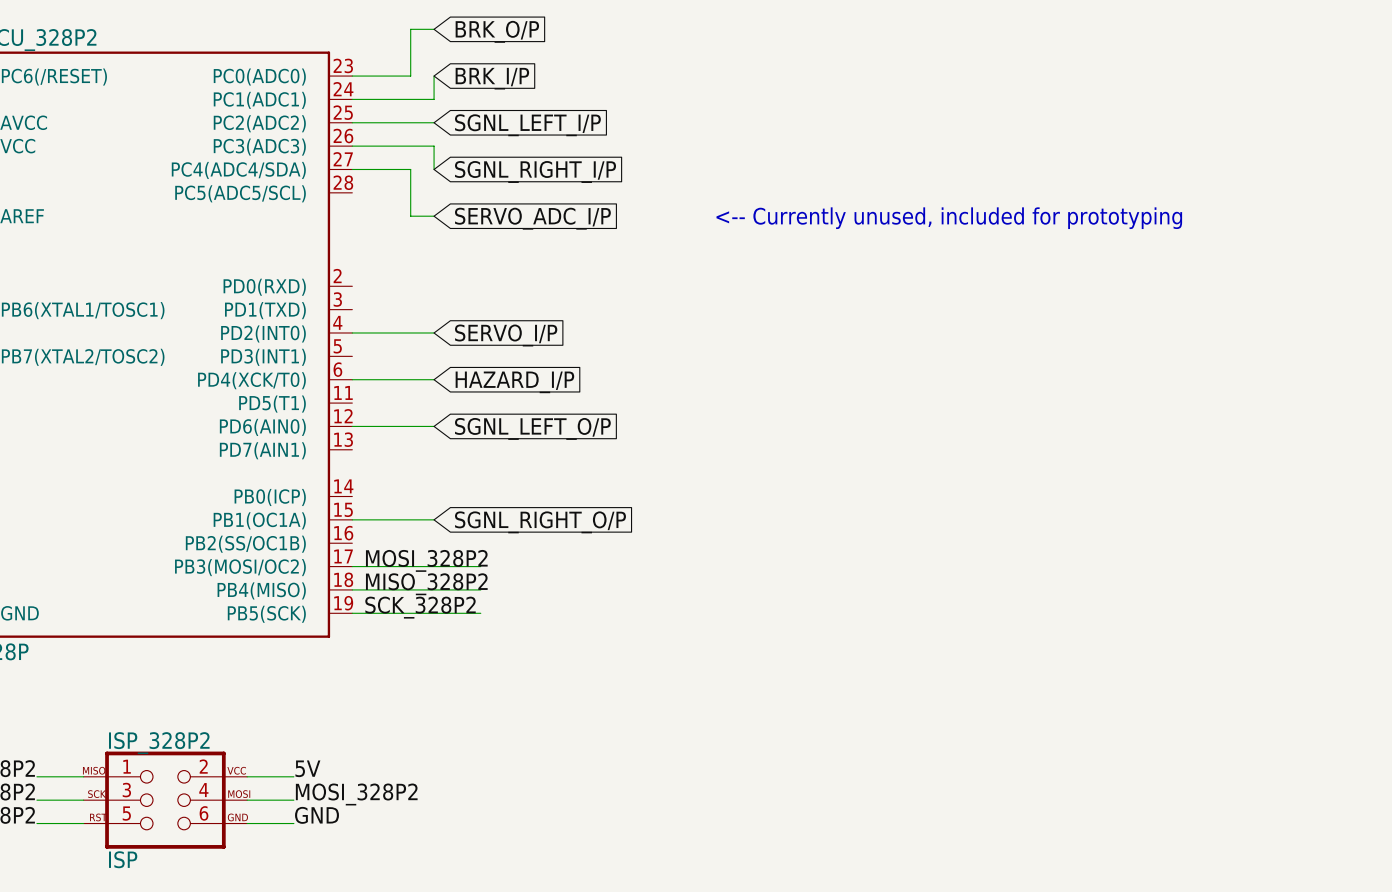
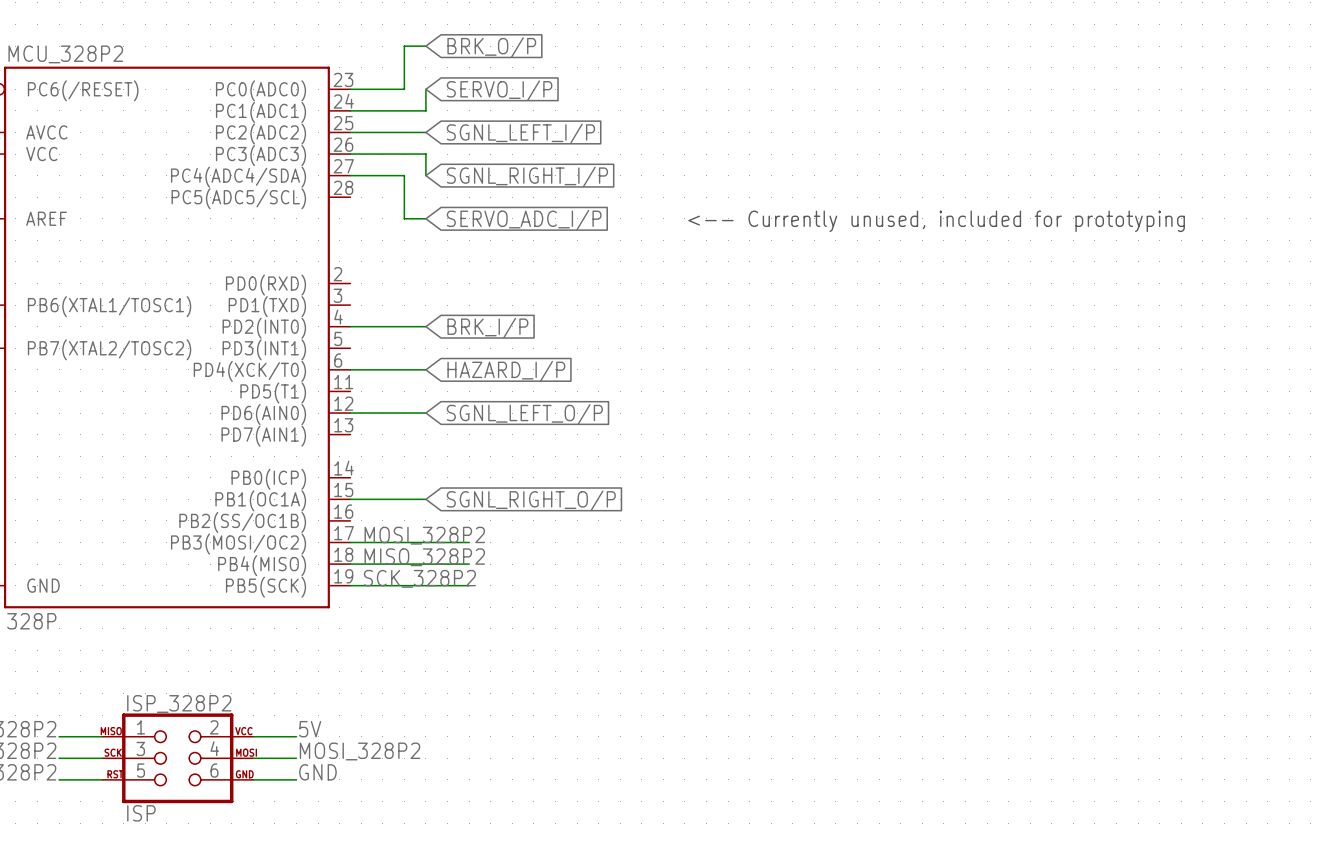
global label: BRK_I/P (492, 78) -> SERVO_I/P (499, 90)
global label: SERVO_I/P (506, 335) -> BRK_I/P (487, 328)

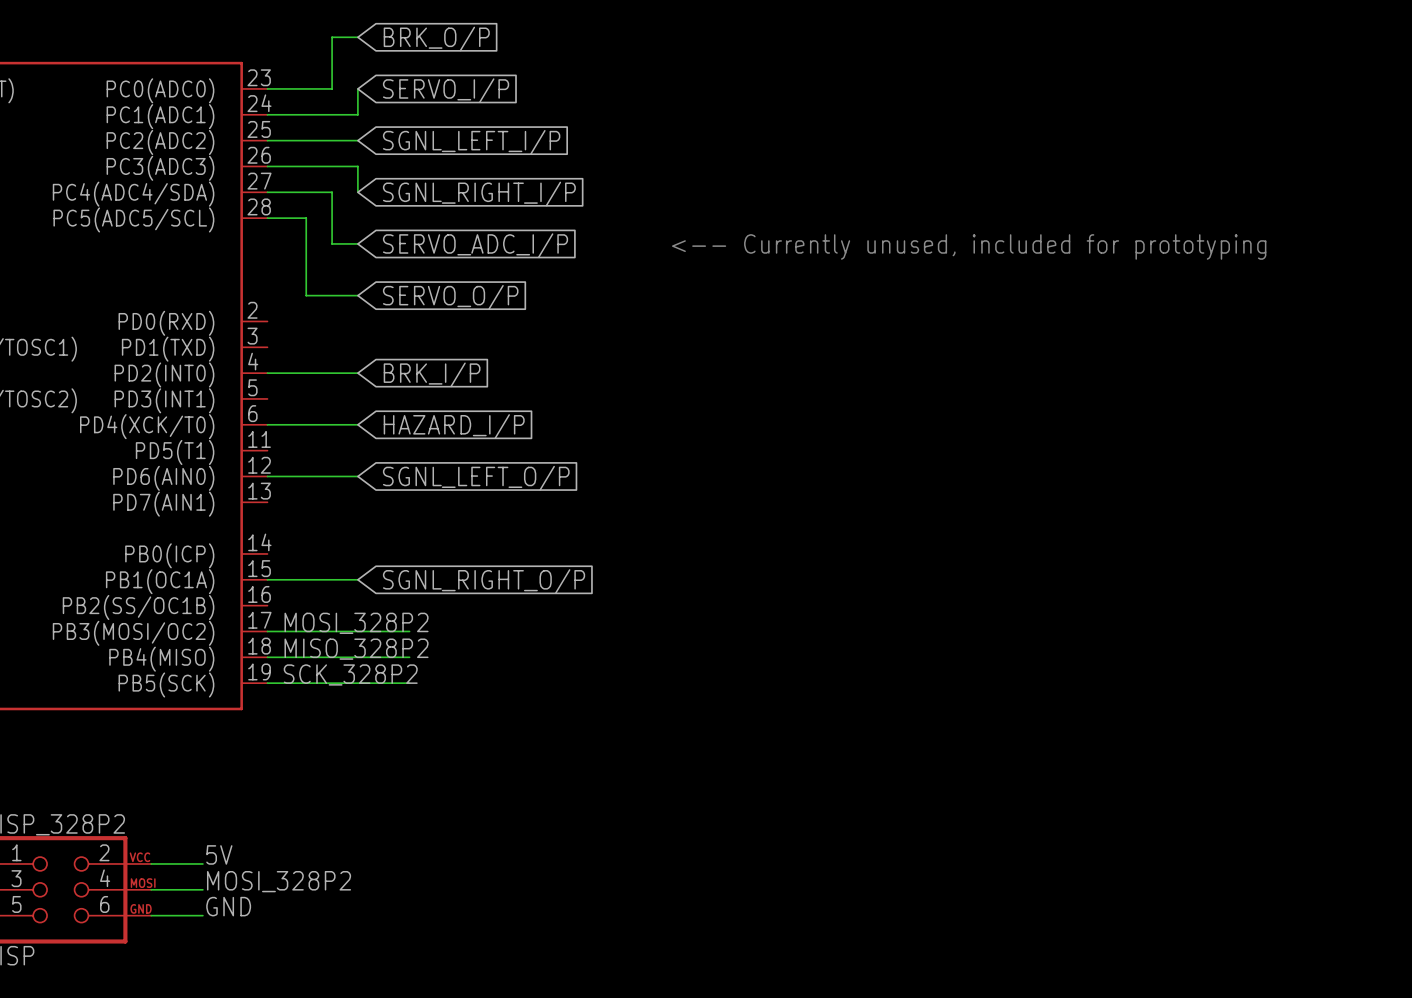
wire: none -> (267, 218) (306, 218) (306, 295) (357, 295)
global label: none -> SERVO_O/P (450, 297)

